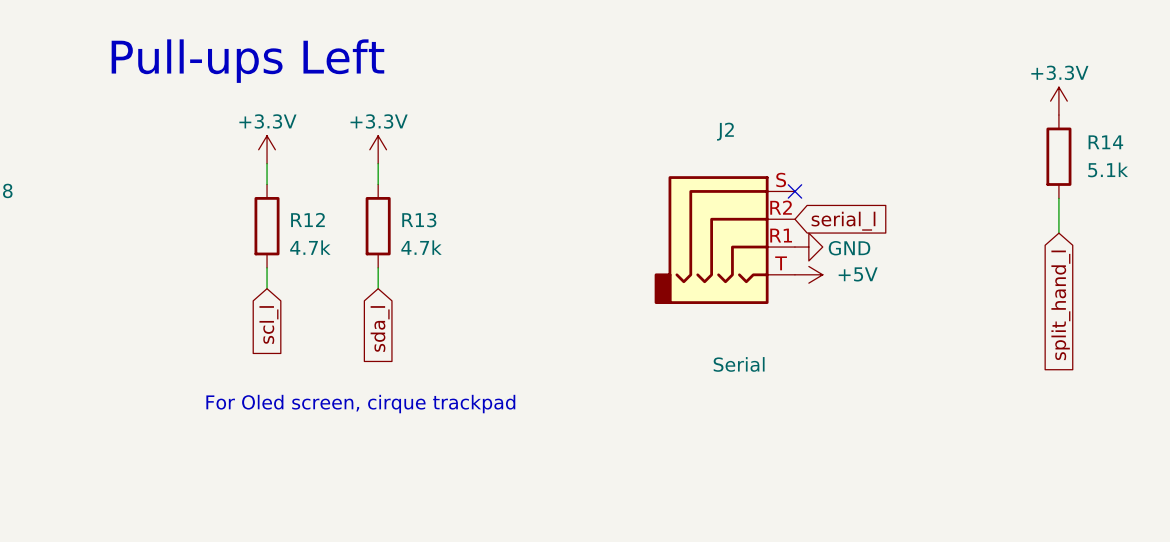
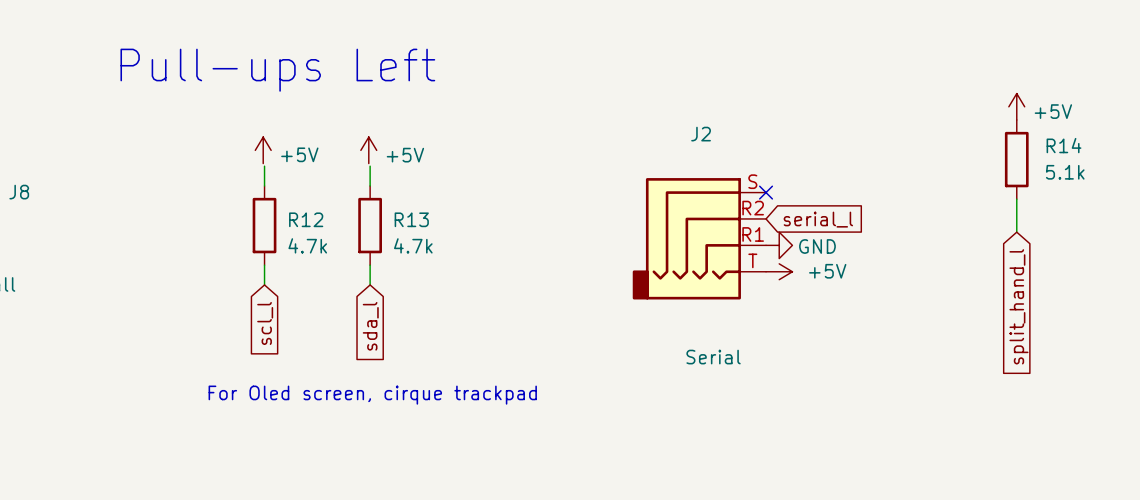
power symbol: +3.3V (1058, 101) -> +5V (1016, 106)
power symbol: +3.3V (267, 149) -> +5V (263, 150)
power symbol: +3.3V (378, 149) -> +5V (368, 150)

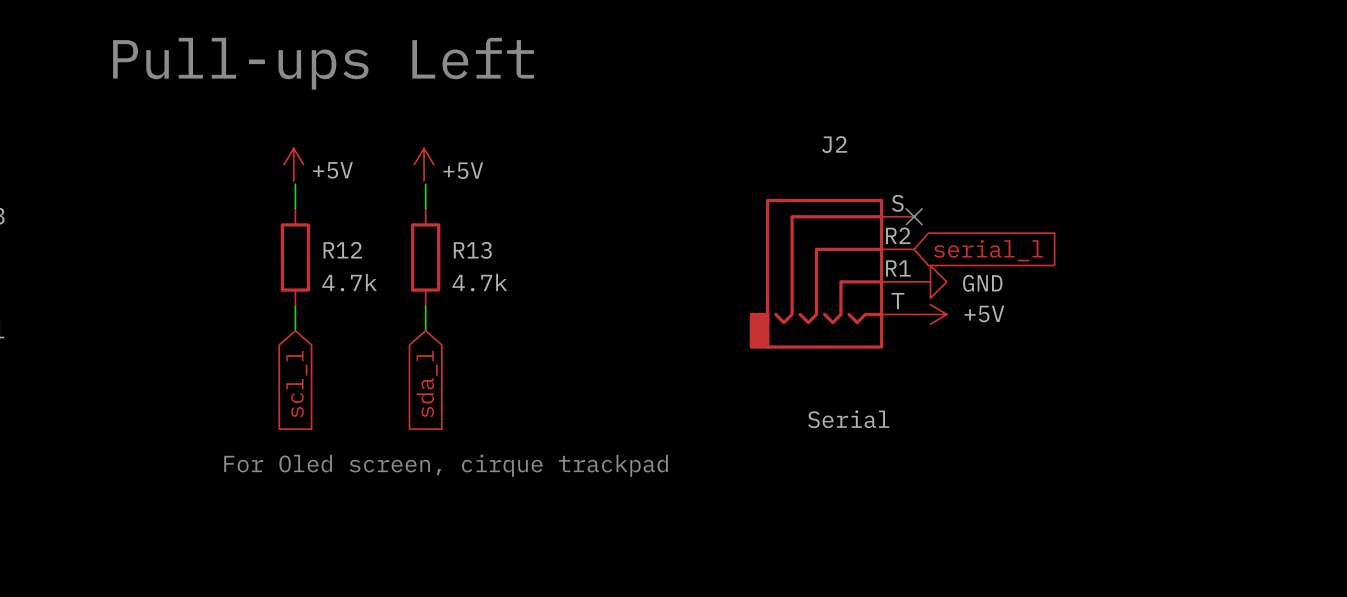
power symbol: +5V (1016, 106) -> none
R14: 5.1k (1016, 159) -> none
wire: (1016, 199) (1016, 232) -> none
global label: split_hand_l (1018, 306) -> none

